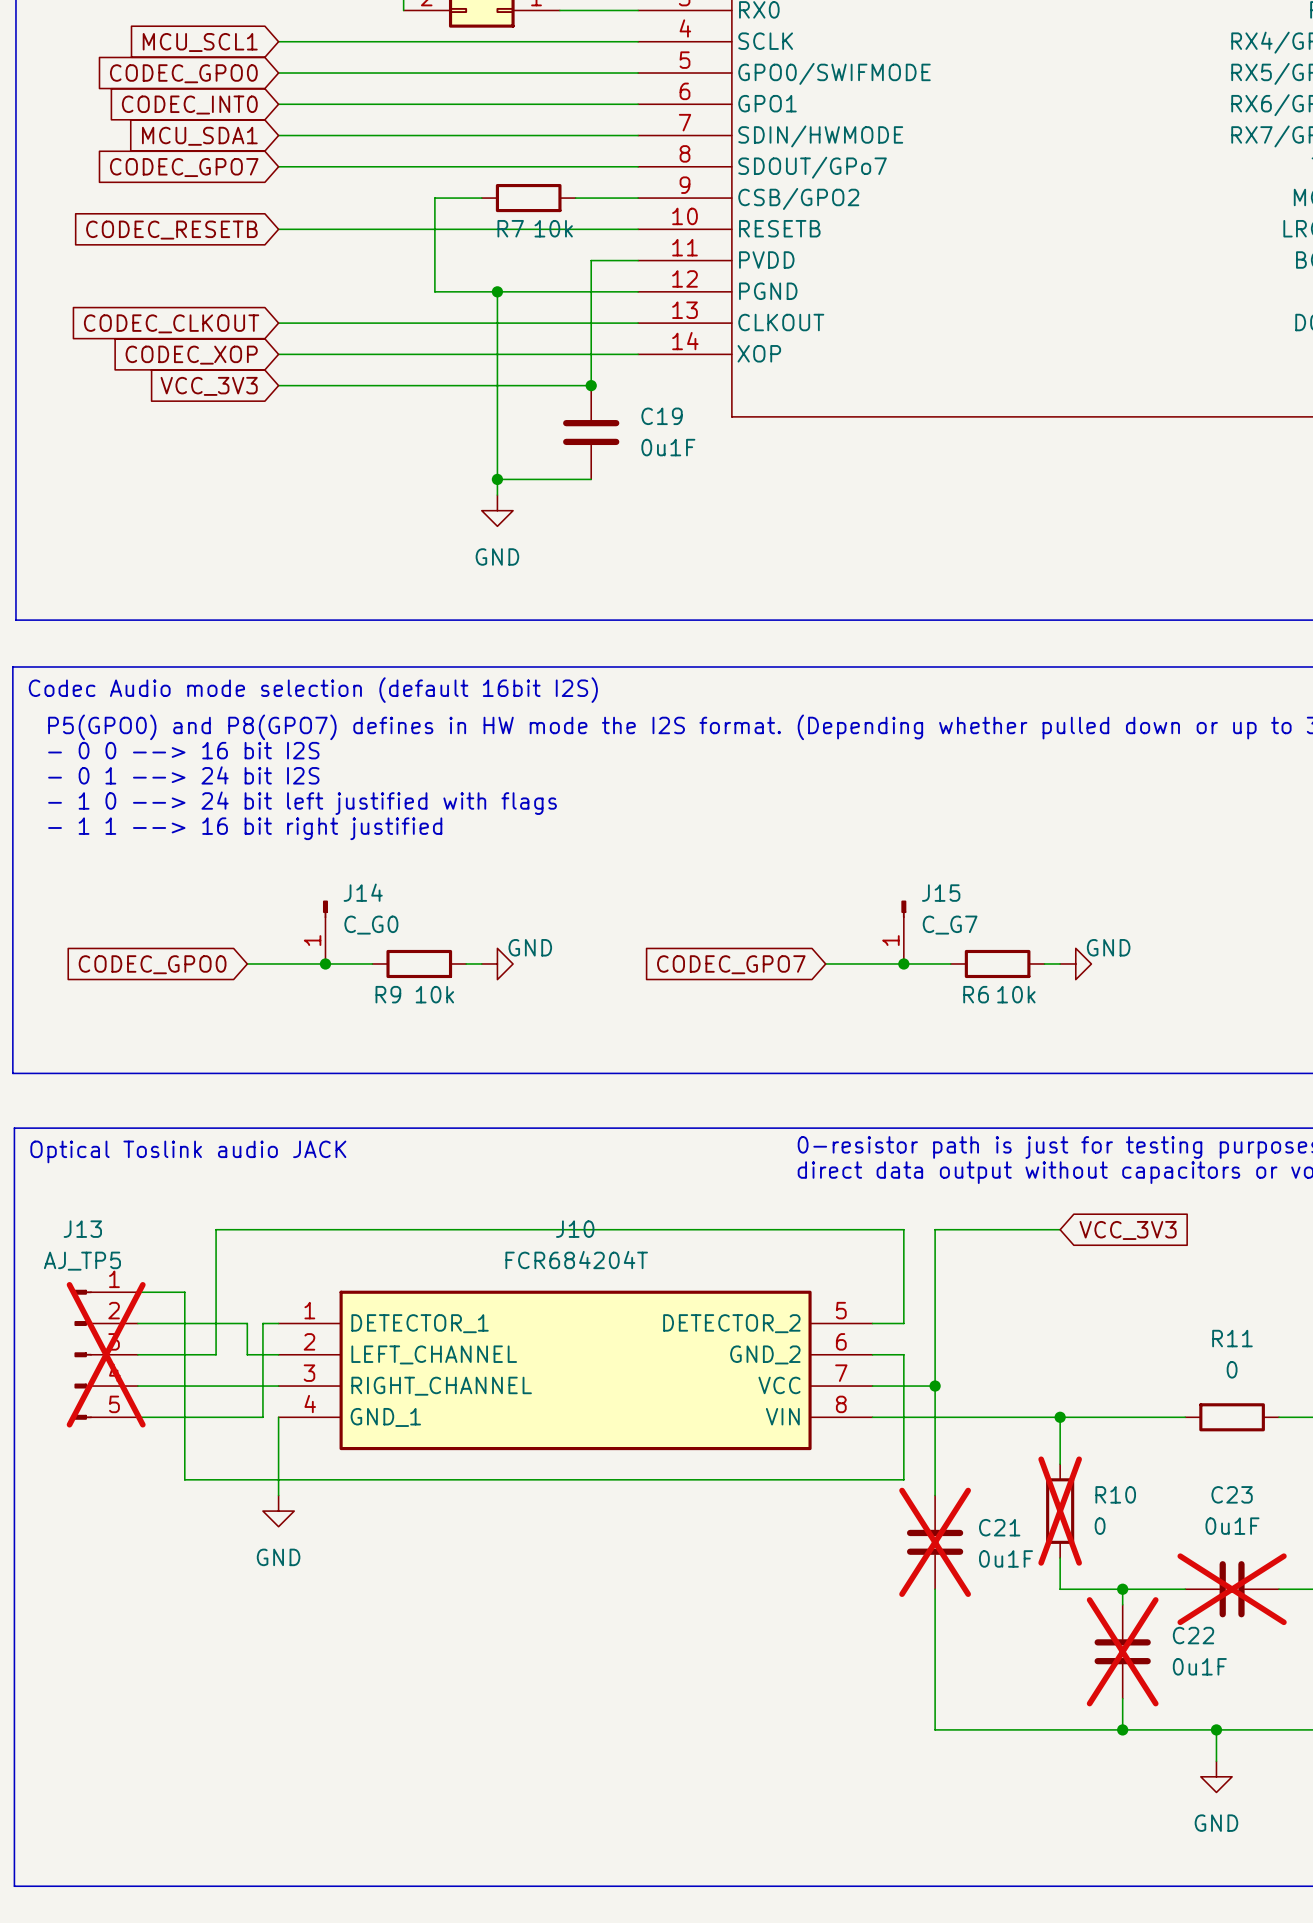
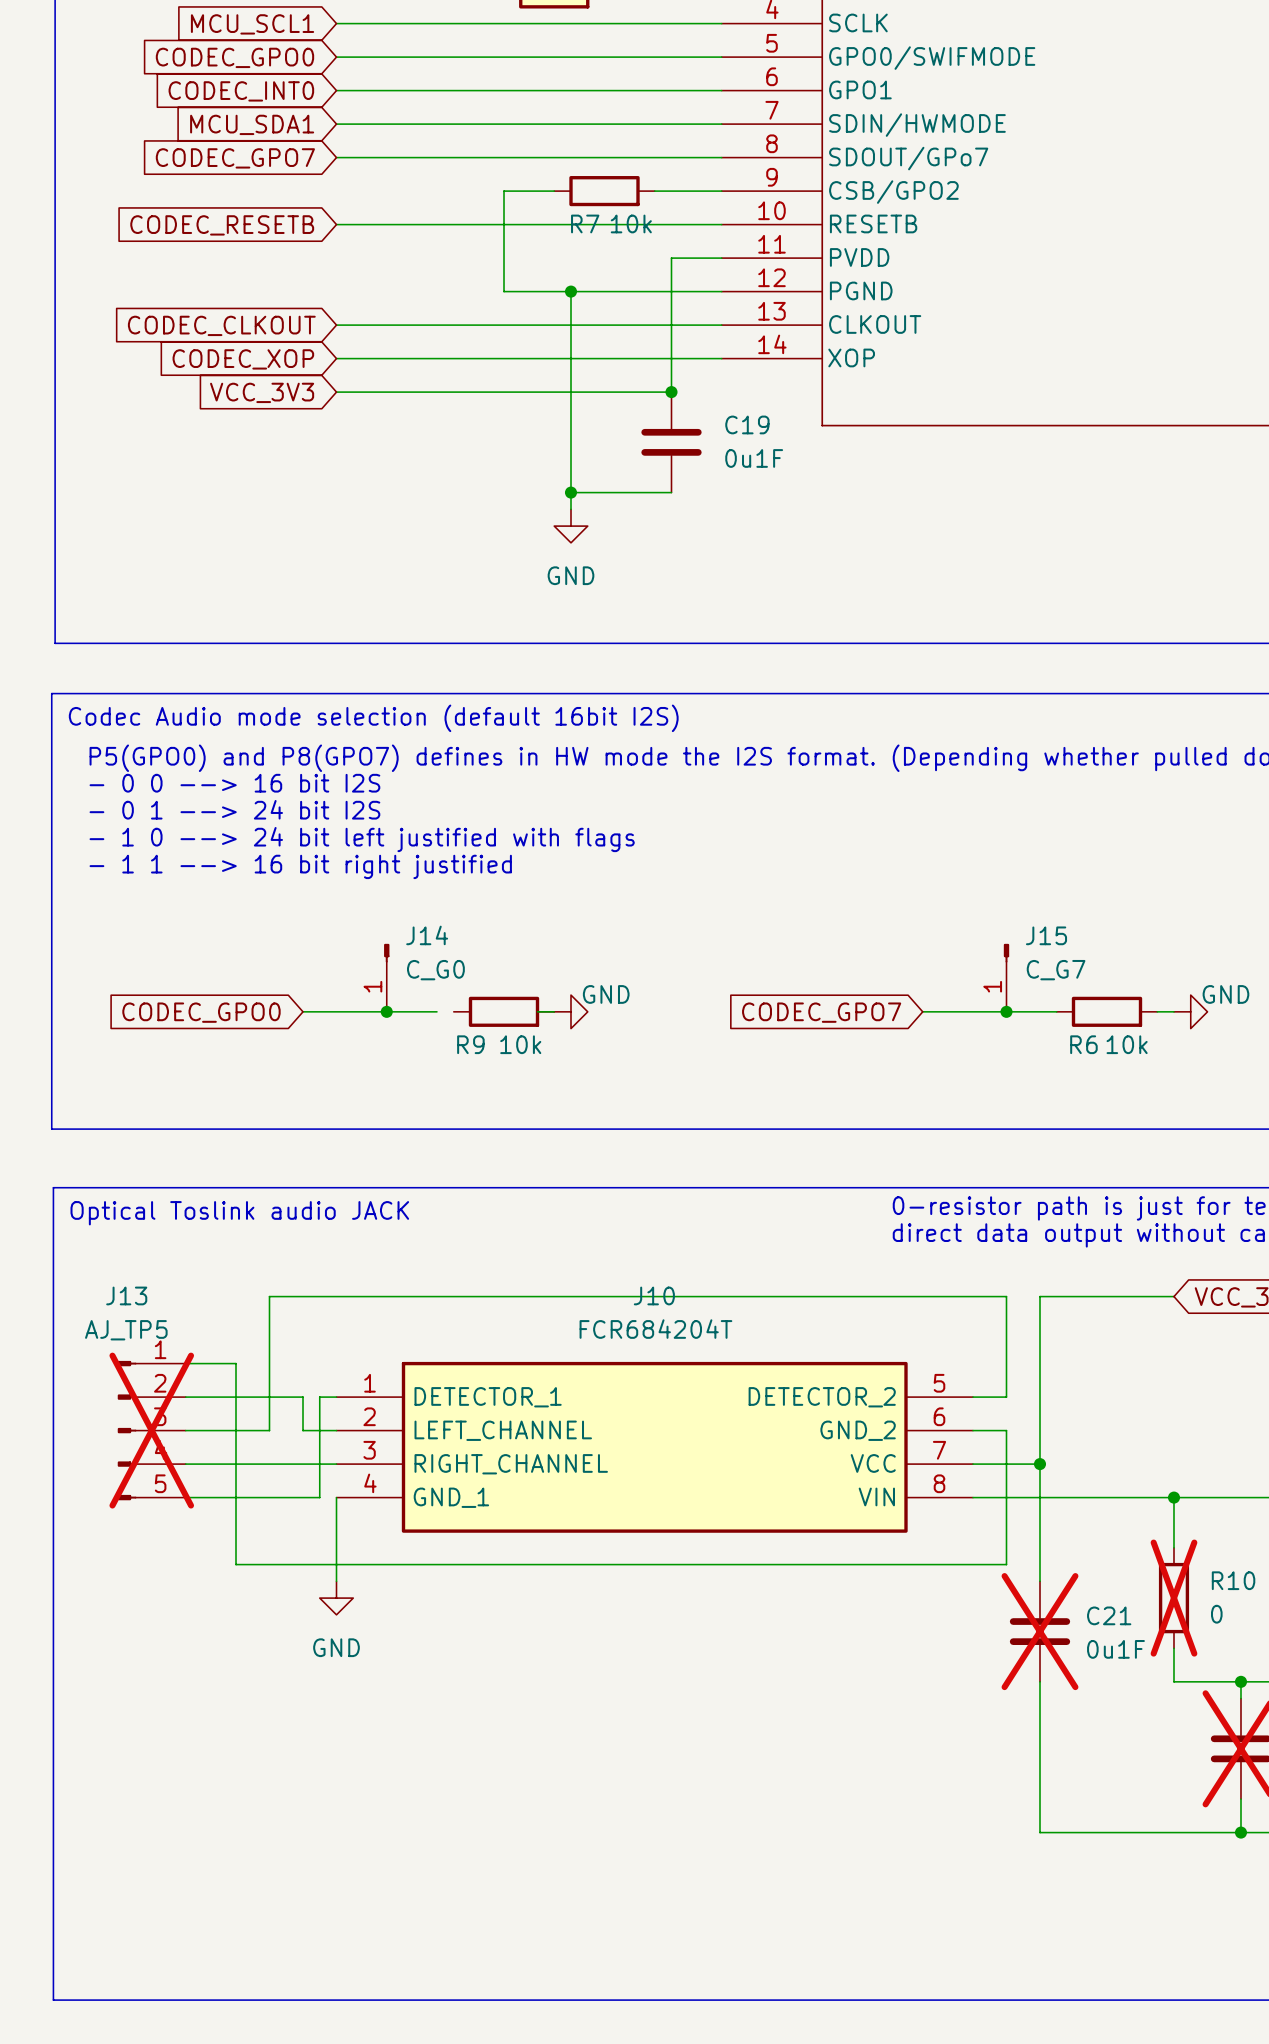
R9 position: (419, 963) -> (504, 1011)

